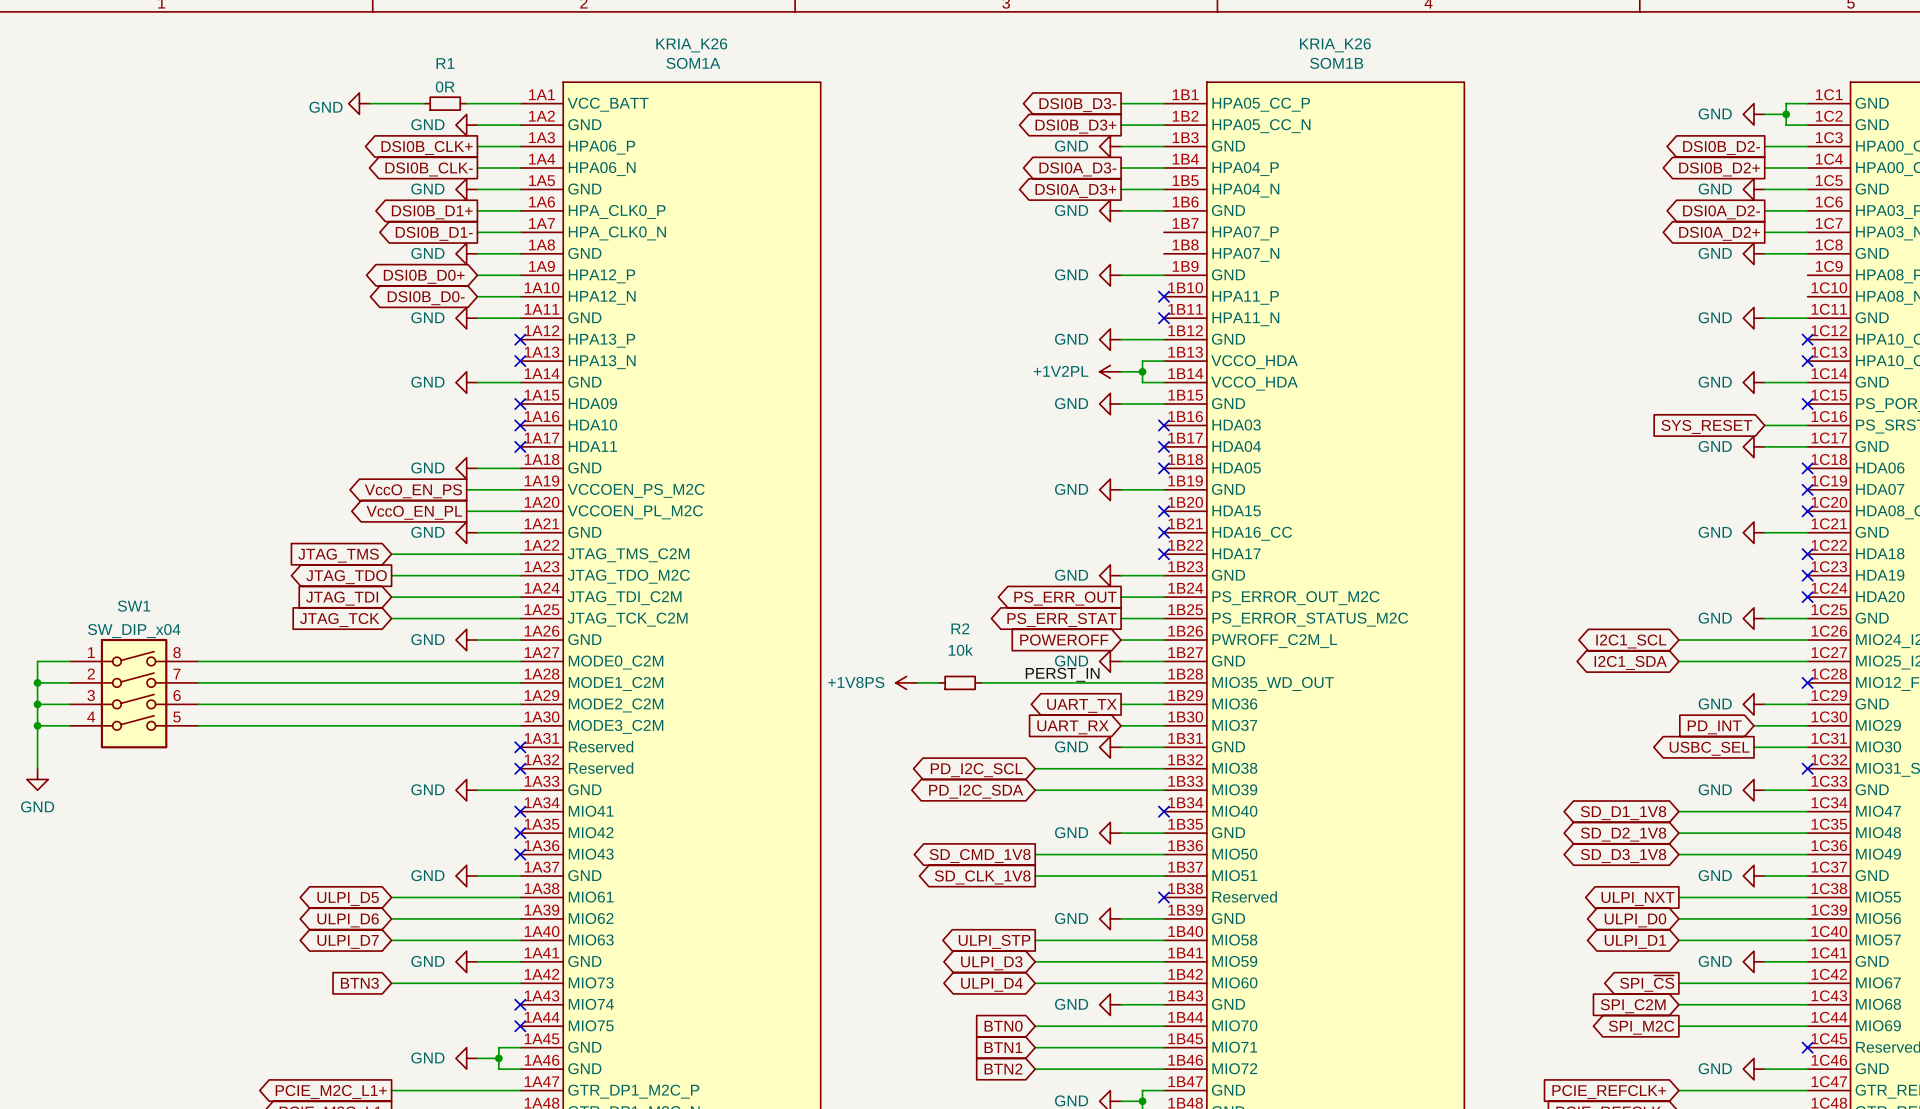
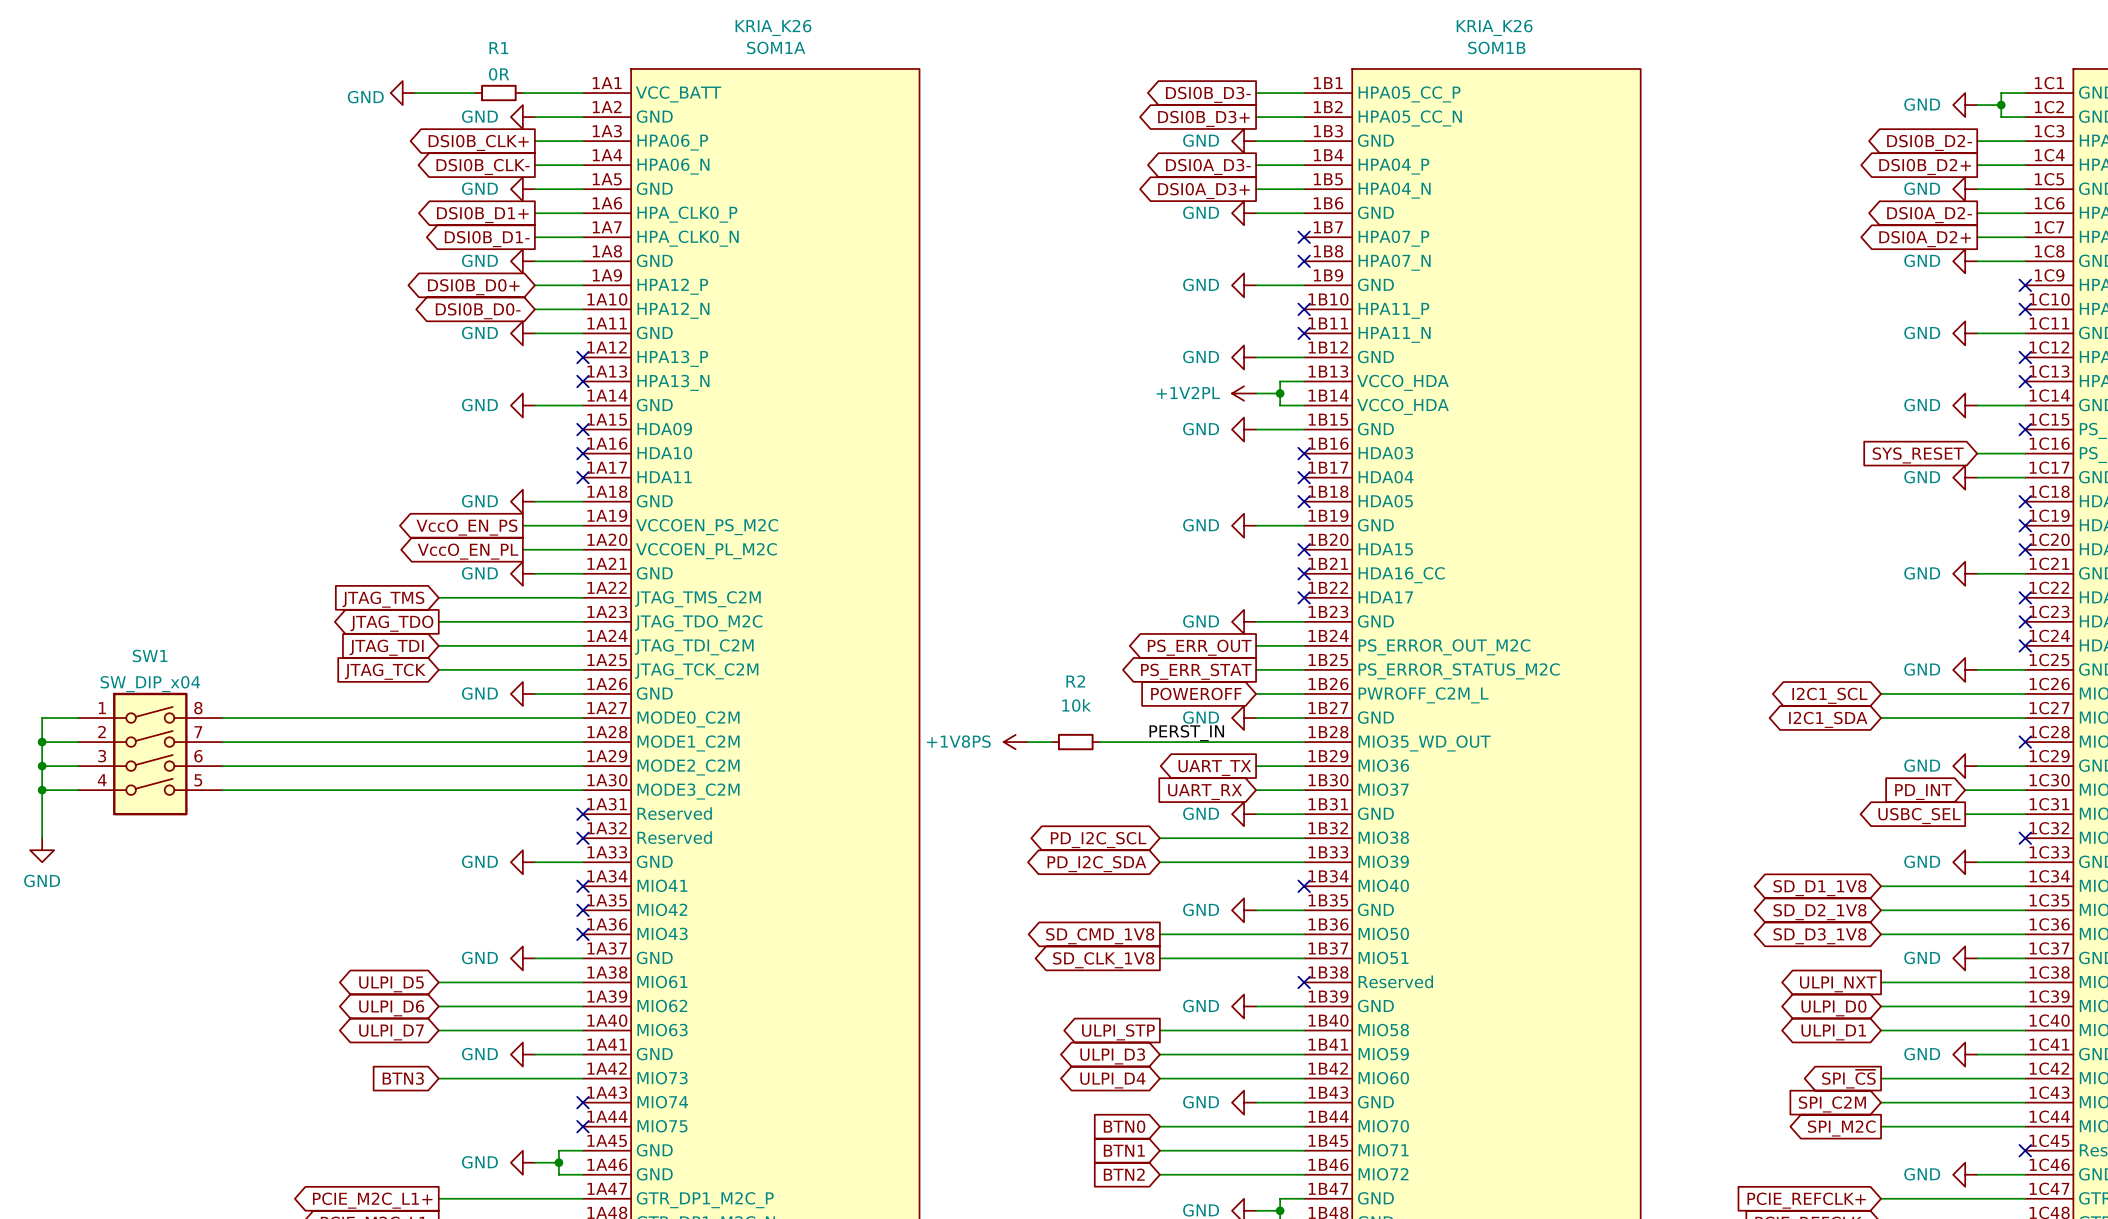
no-connect mark: none -> (1304, 237)
no-connect mark: none -> (1304, 261)
no-connect mark: none -> (2025, 285)
no-connect mark: none -> (2025, 309)

